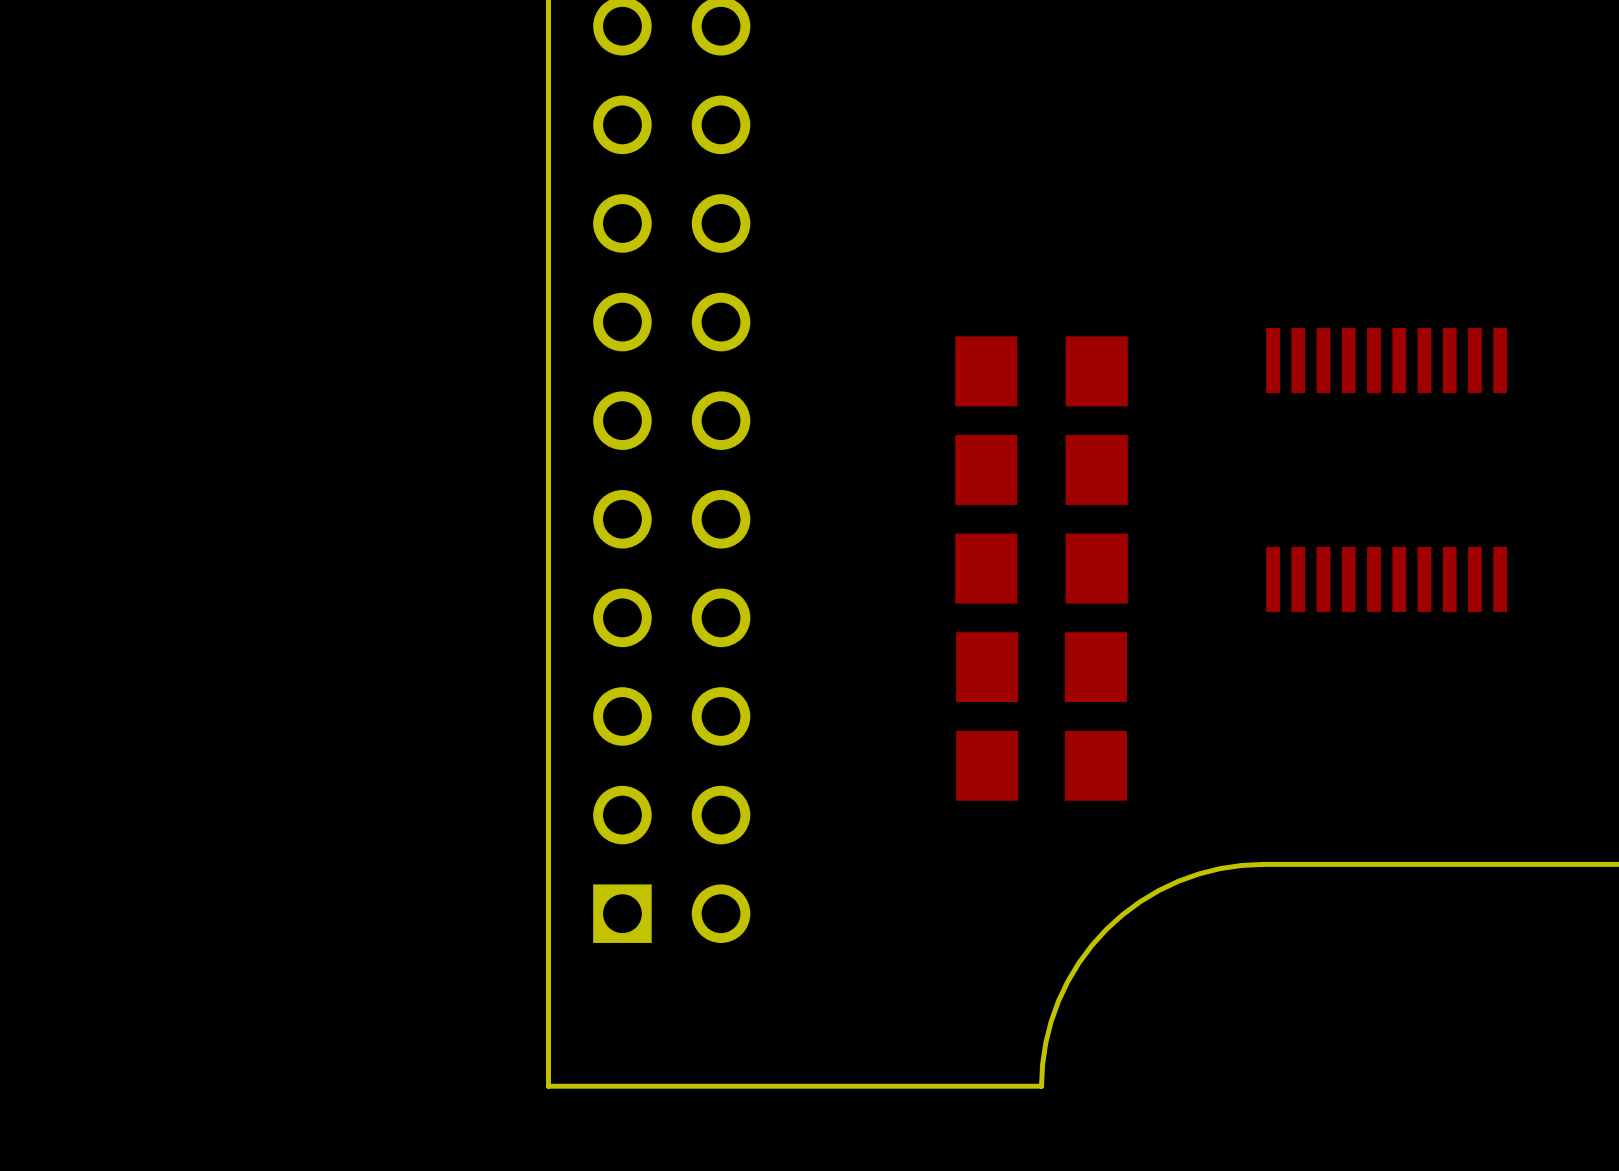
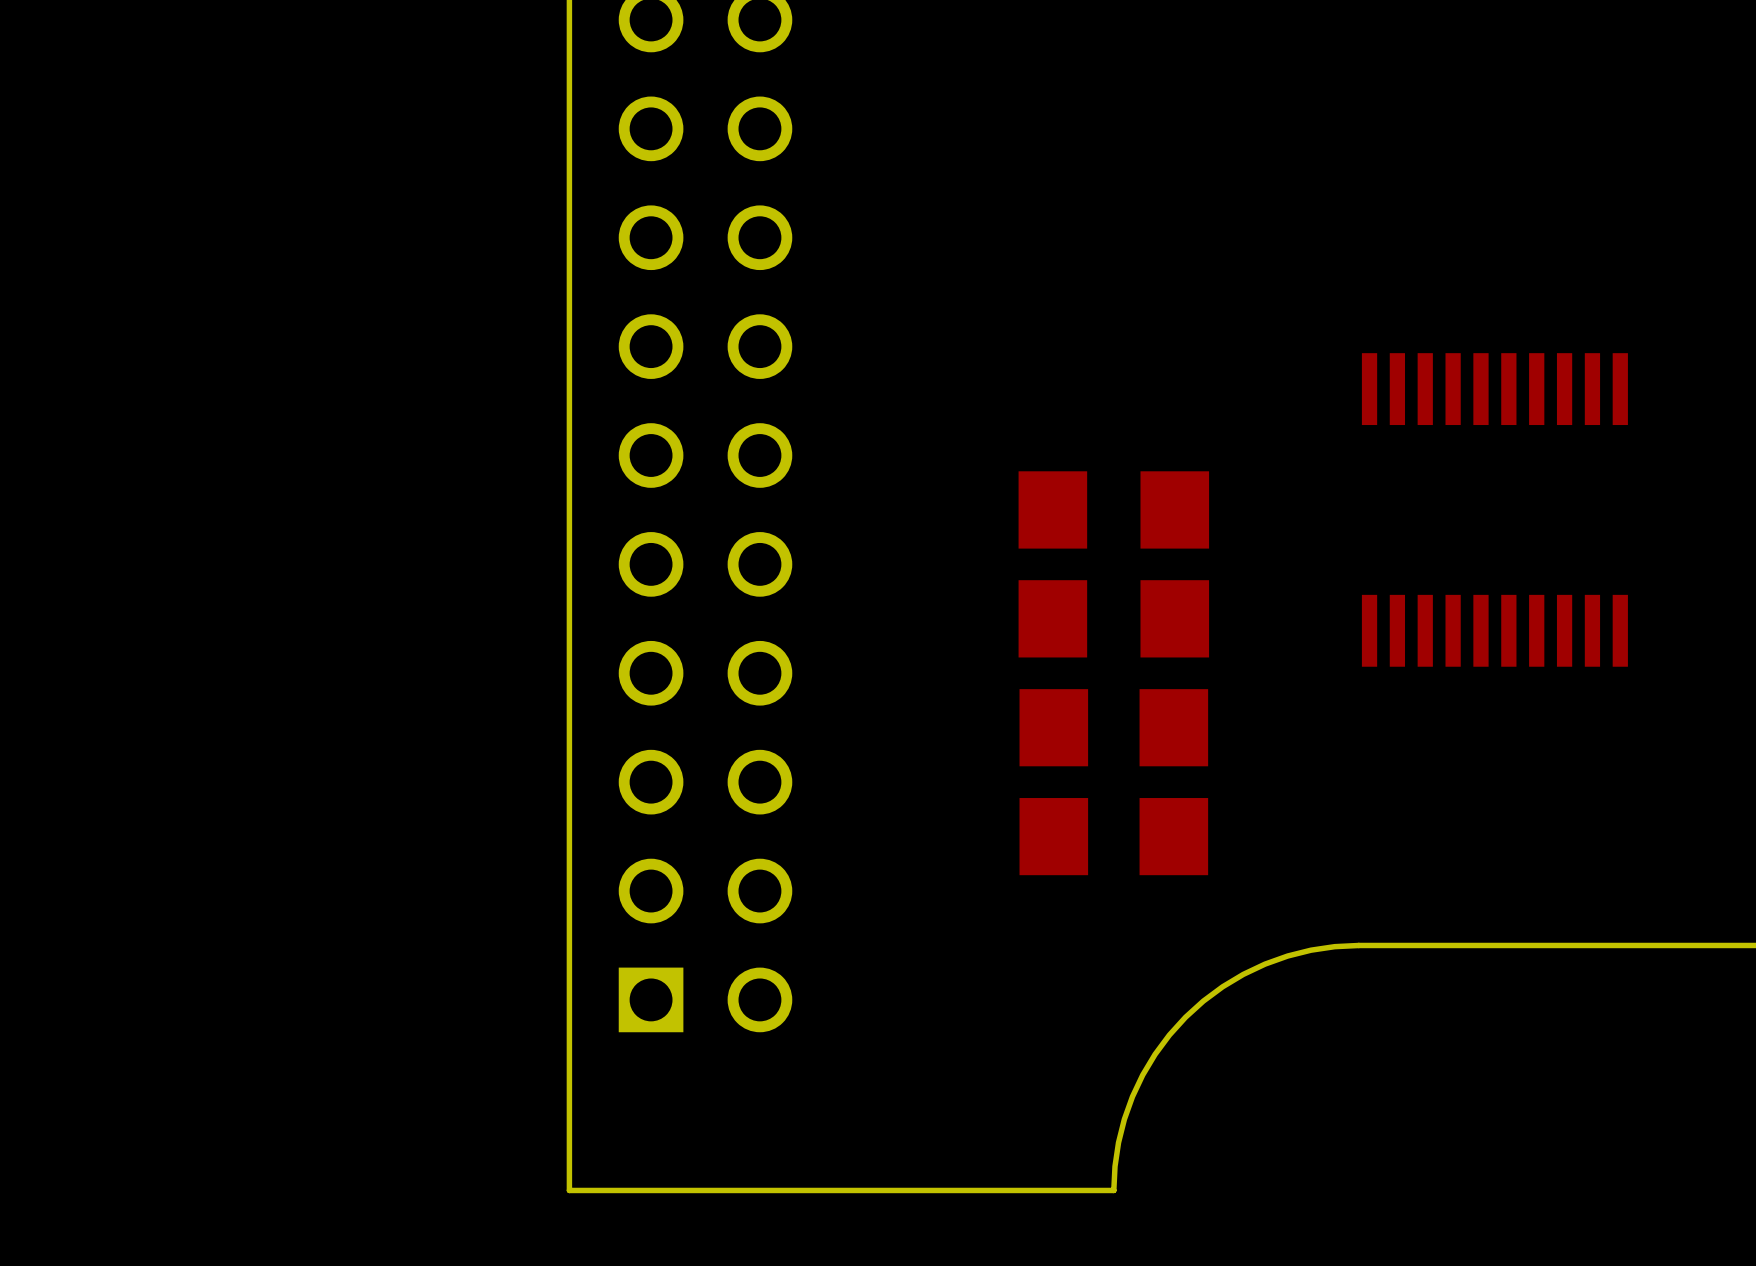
part: (1041, 371) -> none

